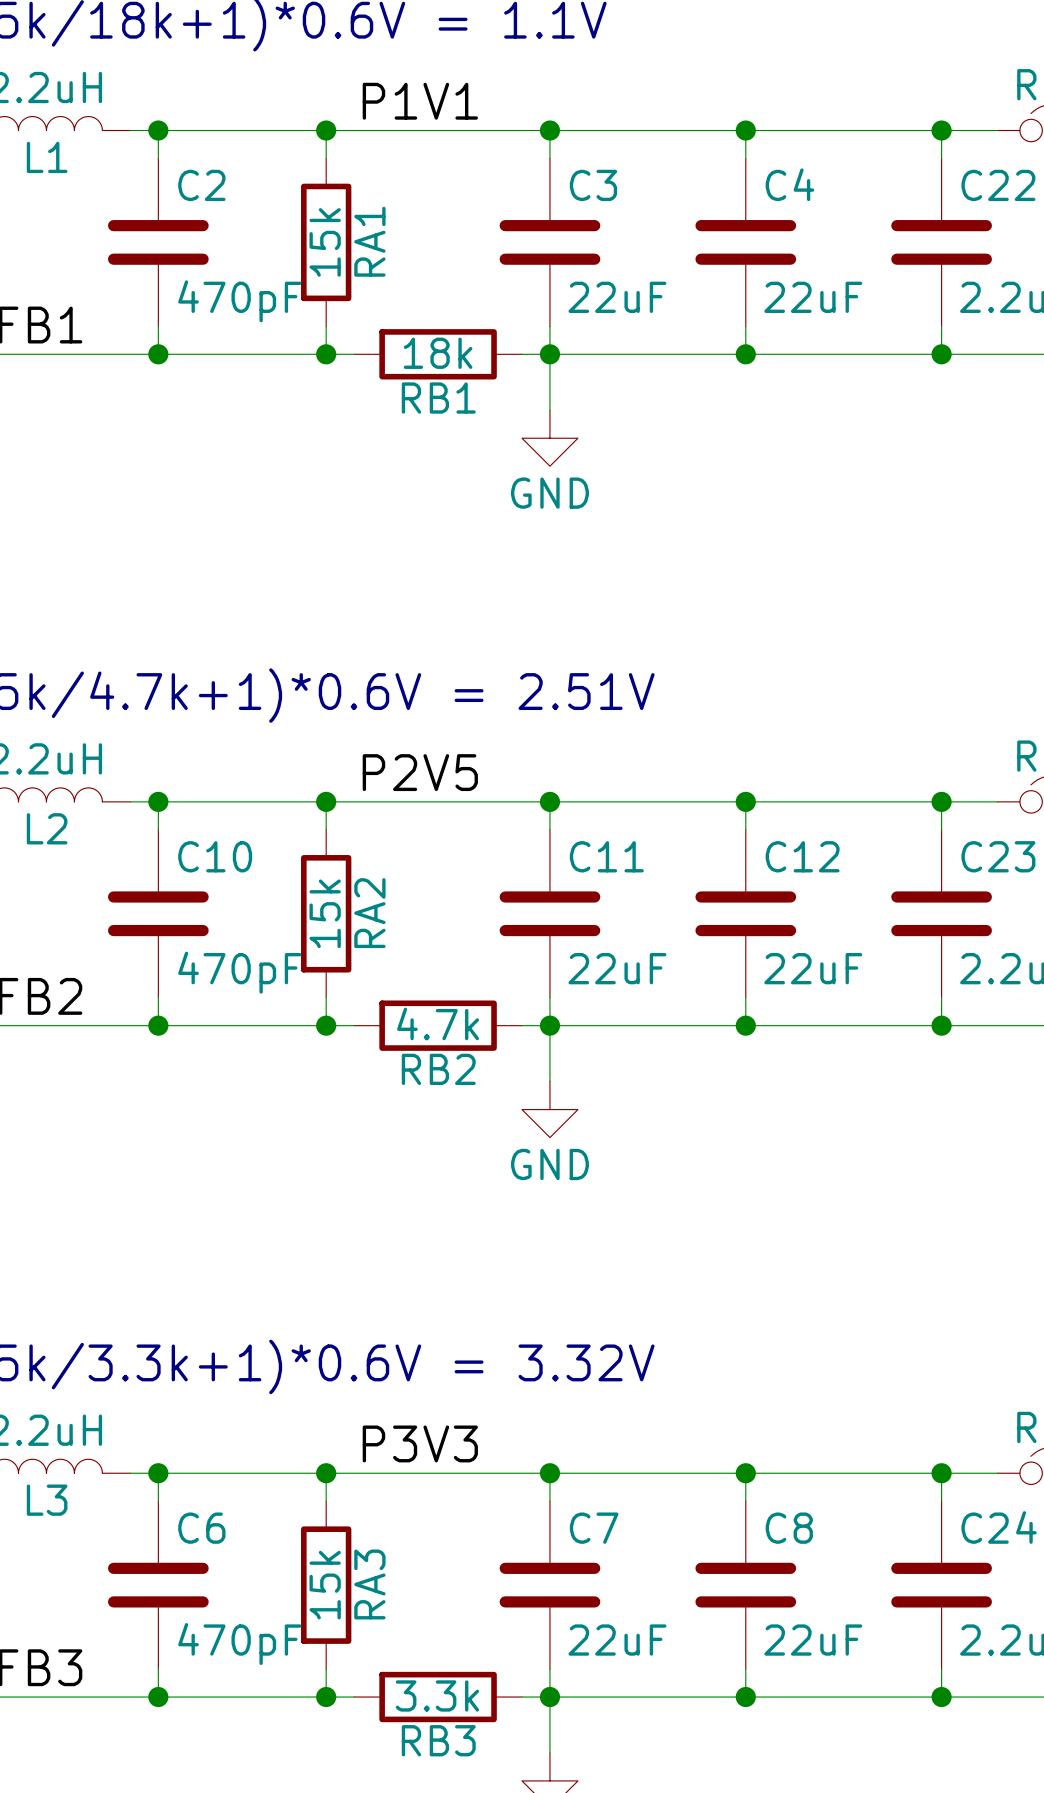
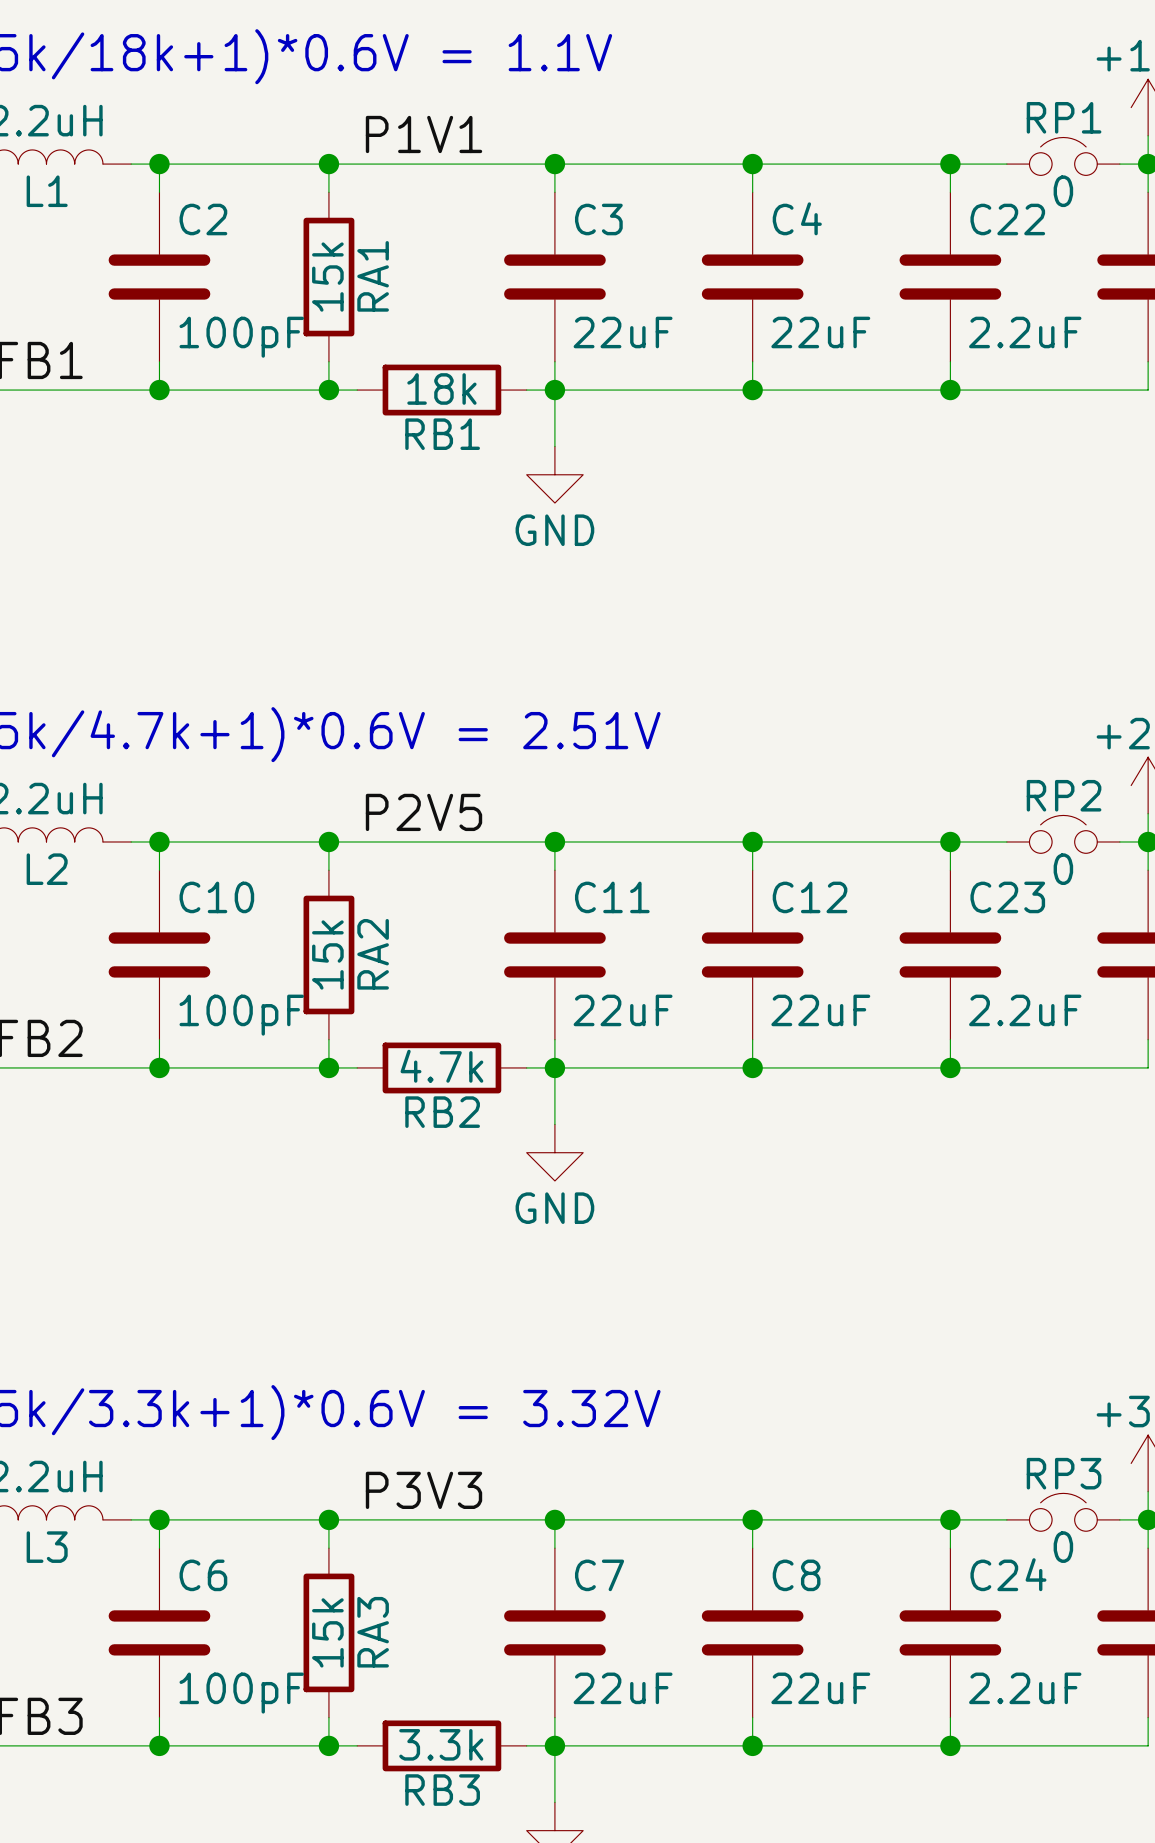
C2 value: 470pF (239, 301) -> 100pF (241, 337)
C10 value: 470pF (239, 972) -> 100pF (241, 1015)
C6 value: 470pF (239, 1644) -> 100pF (241, 1693)

